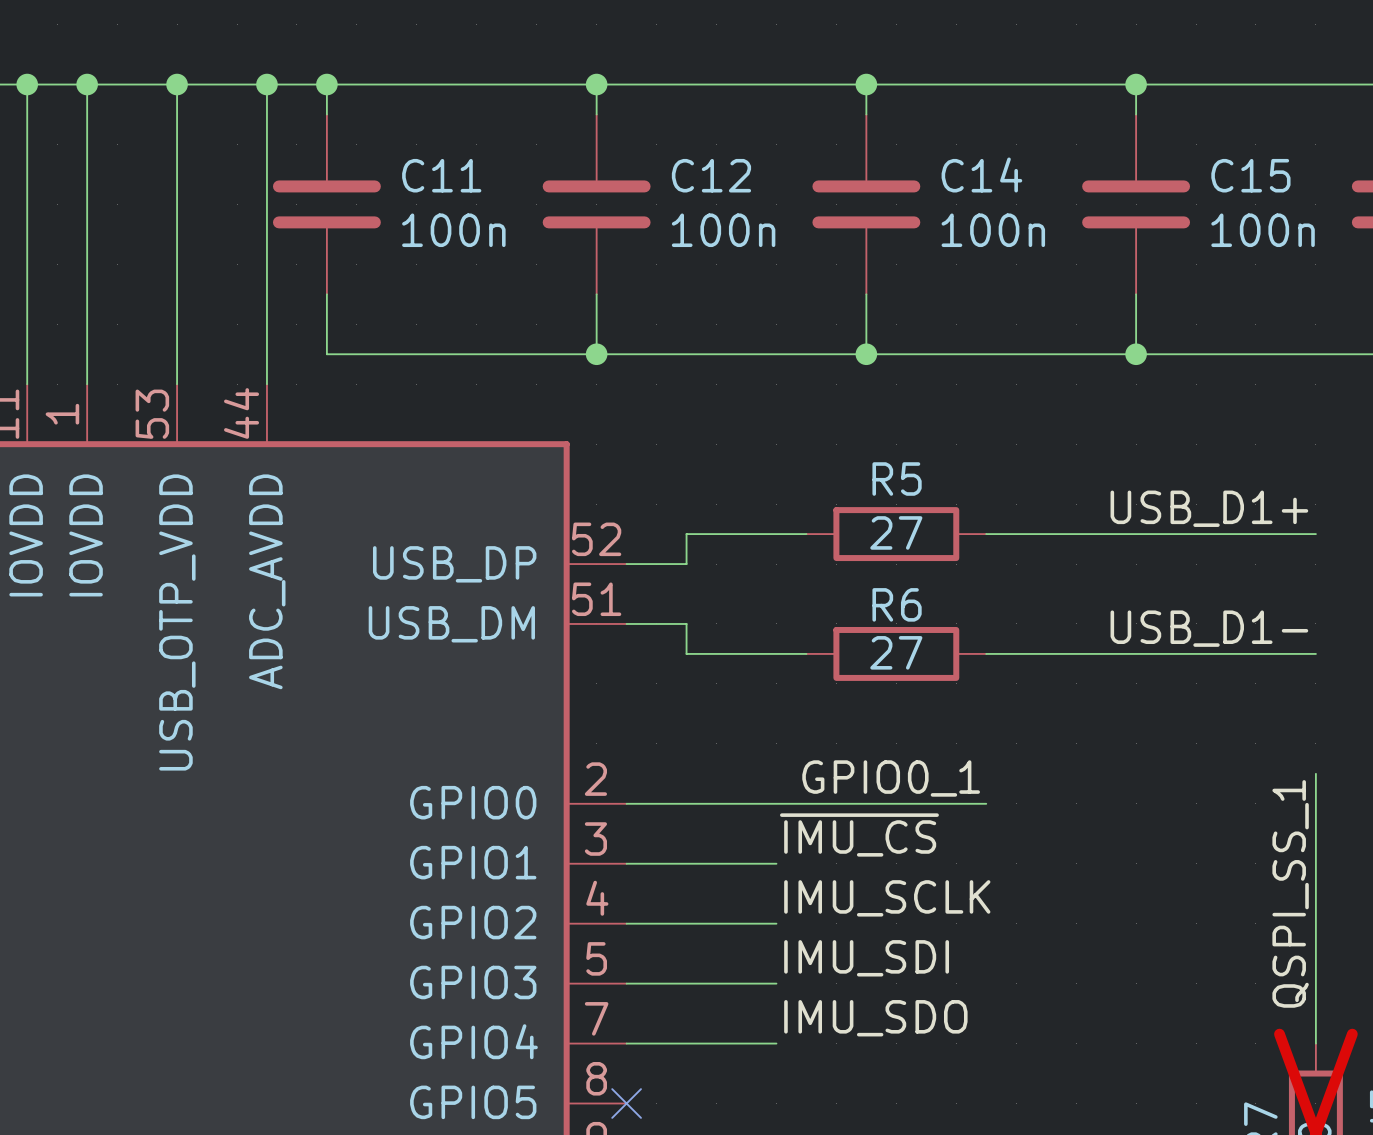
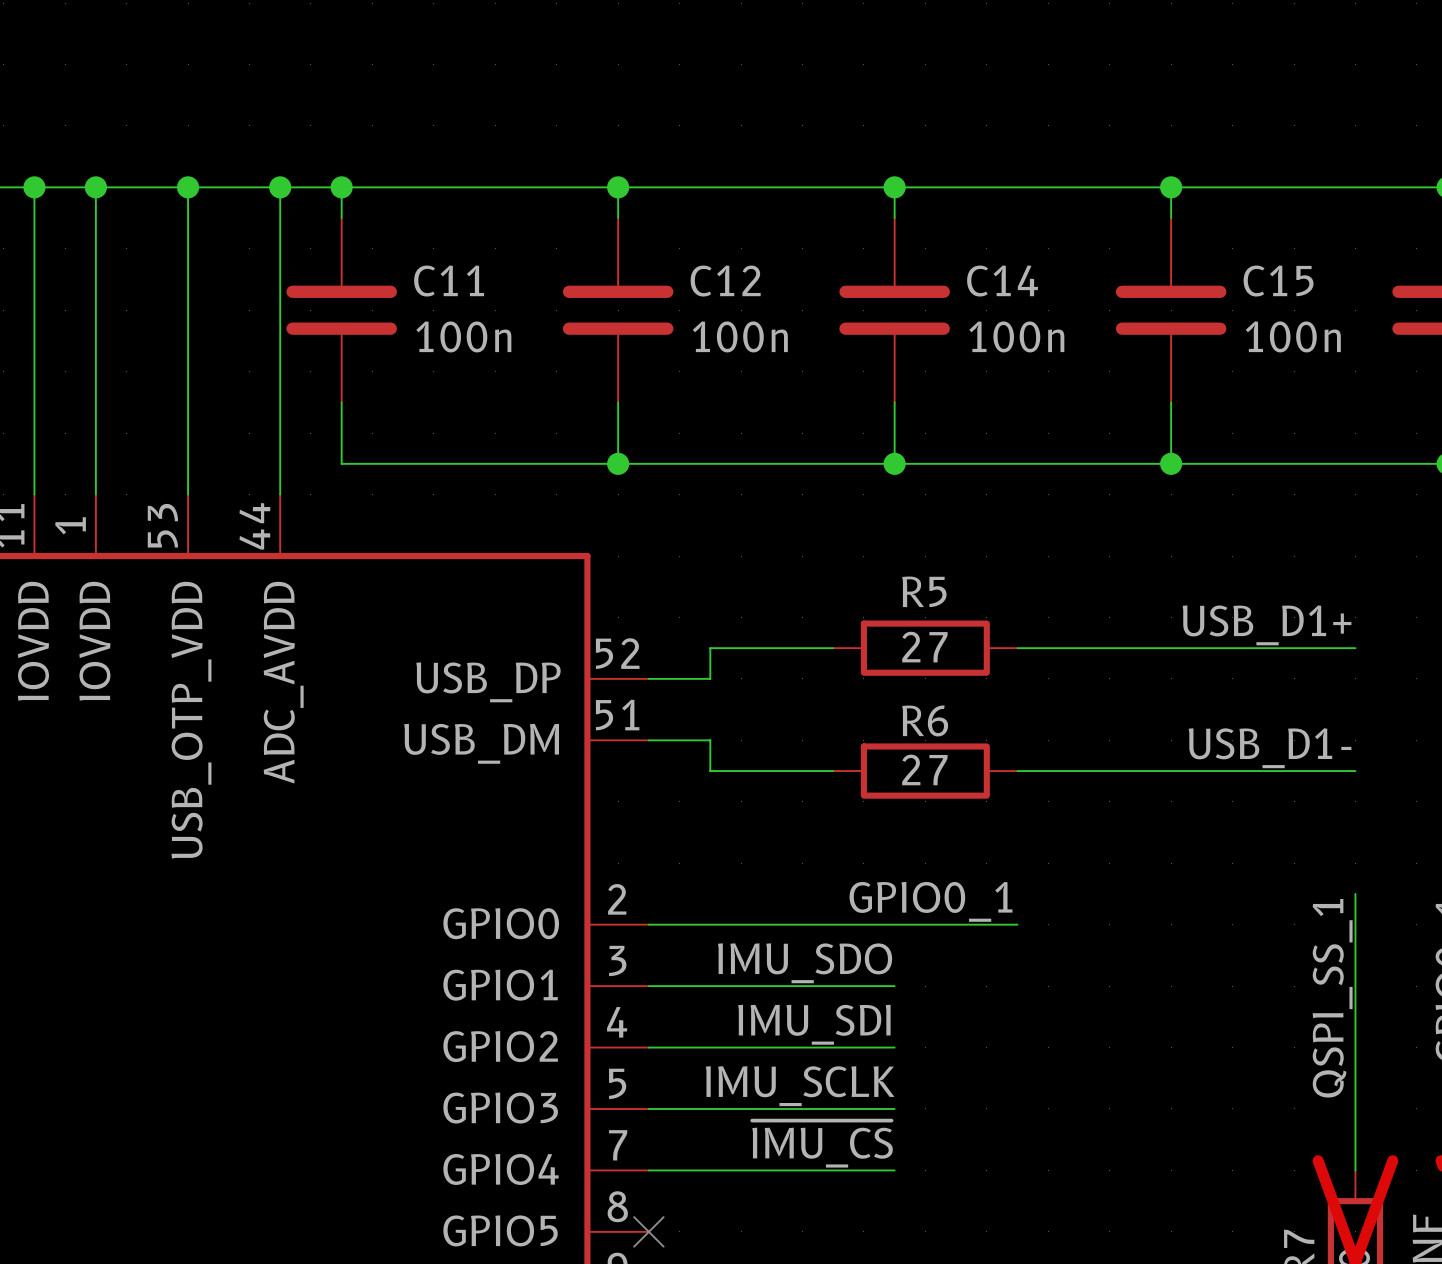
label position: ~{IMU_CS} (859, 834) -> ~{IMU_CS} (822, 1144)
wire: none -> (802, 986) (894, 986)
label position: IMU_SCLK (887, 898) -> IMU_SCLK (800, 1086)
wire: none -> (802, 1047) (894, 1047)
label position: IMU_SDI (866, 958) -> IMU_SDI (814, 1024)
wire: none -> (802, 1108) (894, 1108)
label position: IMU_SDO (875, 1018) -> IMU_SDO (805, 963)
wire: none -> (802, 1170) (894, 1170)

